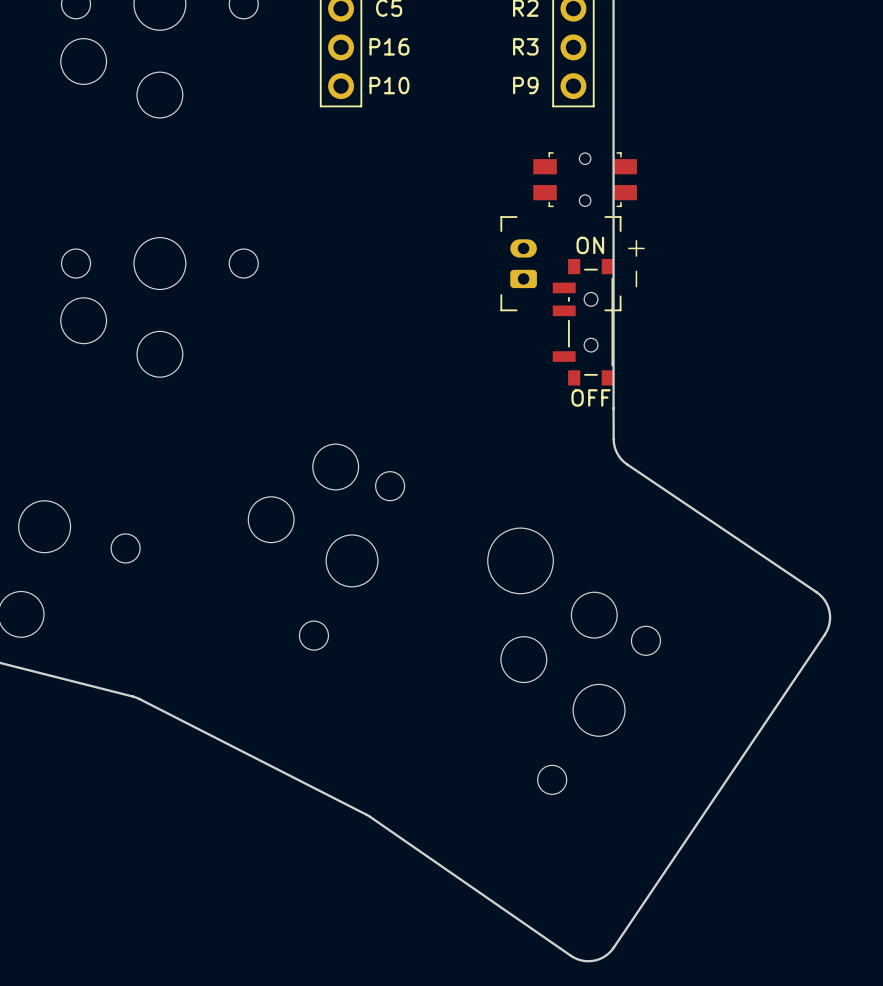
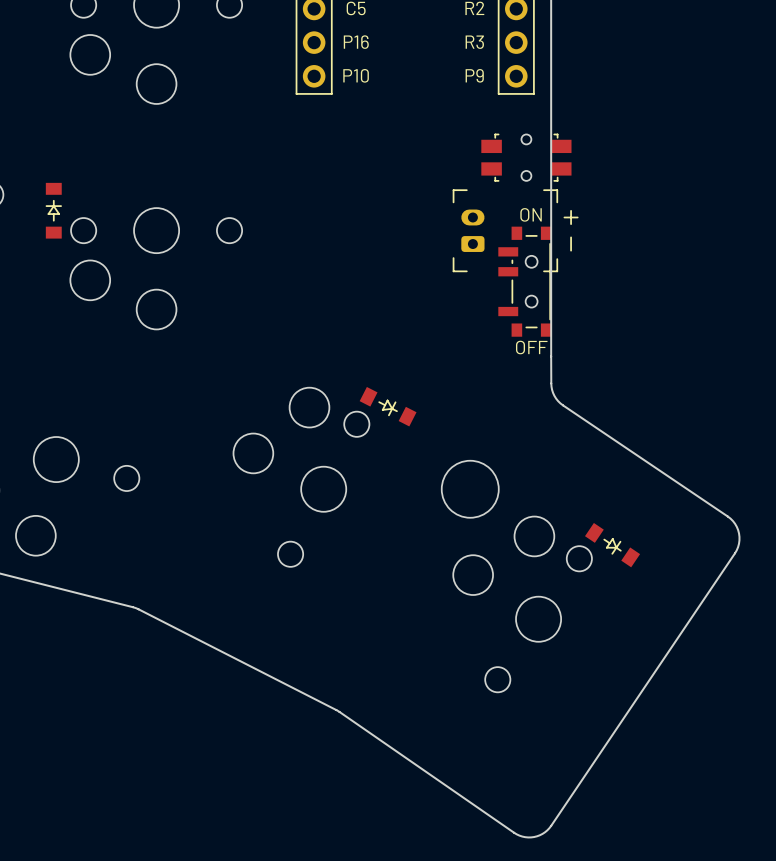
part: none -> (53, 210)
part: none -> (388, 406)
part: none -> (612, 545)

